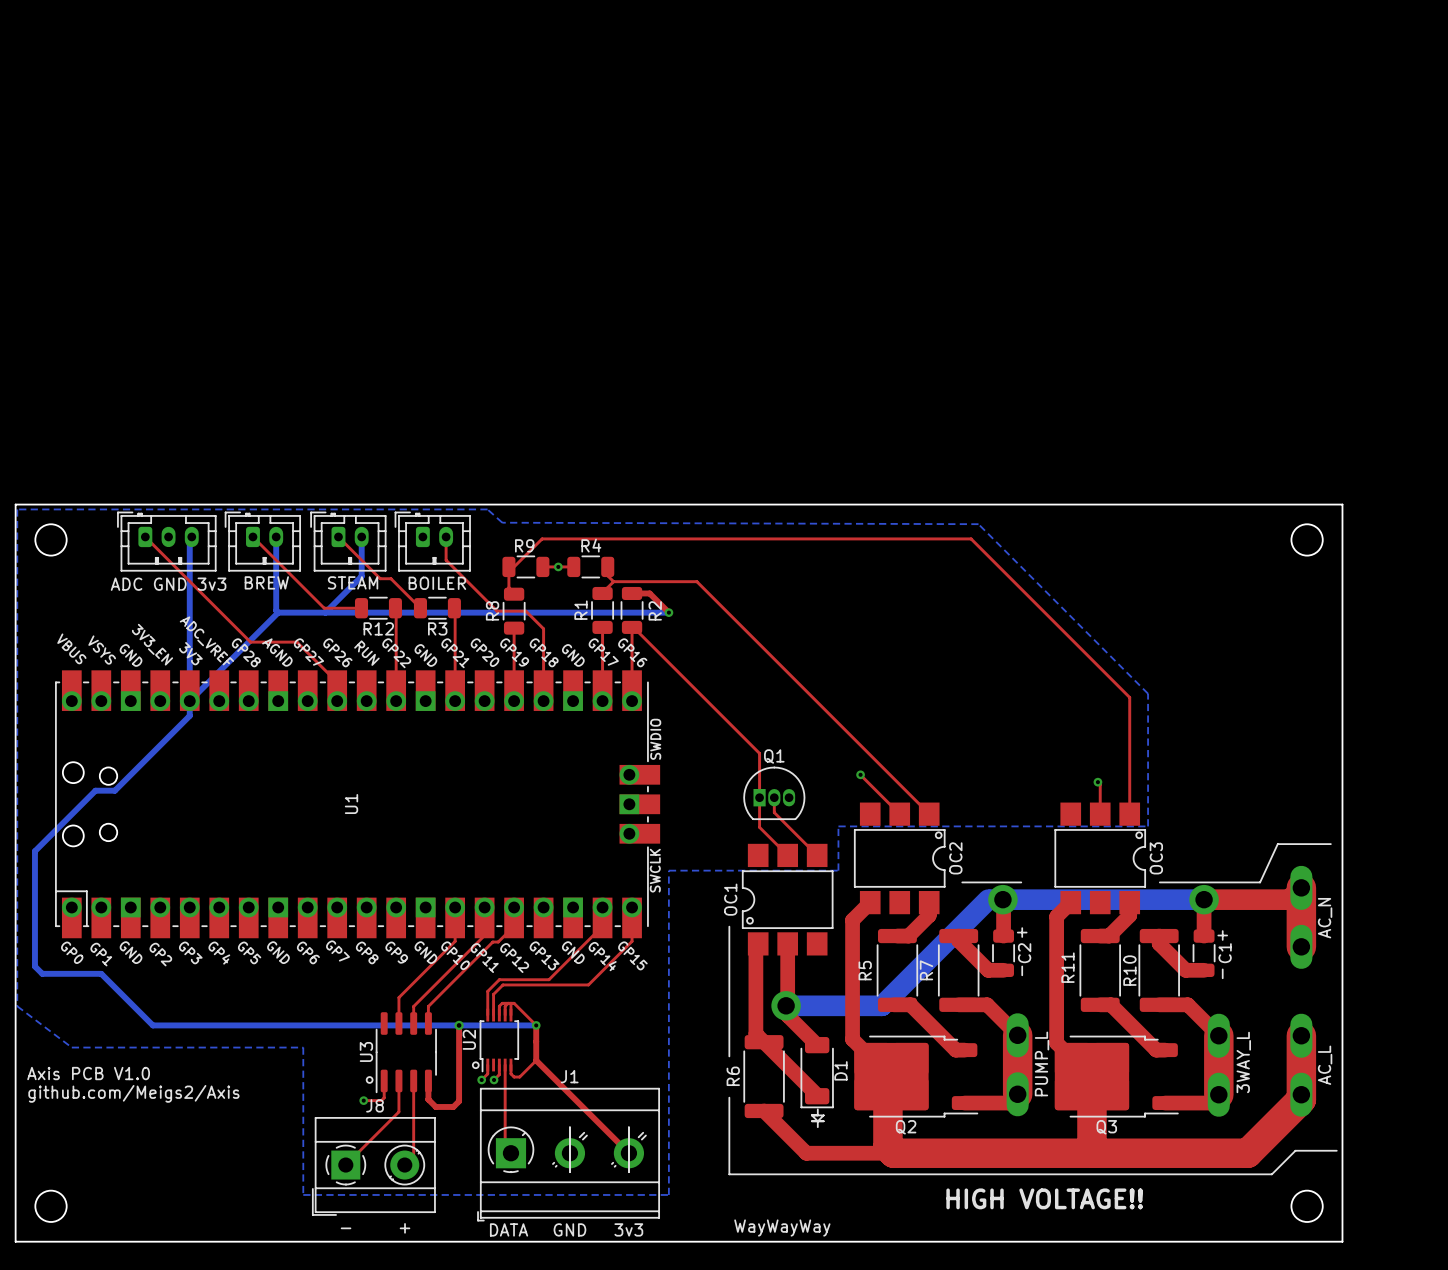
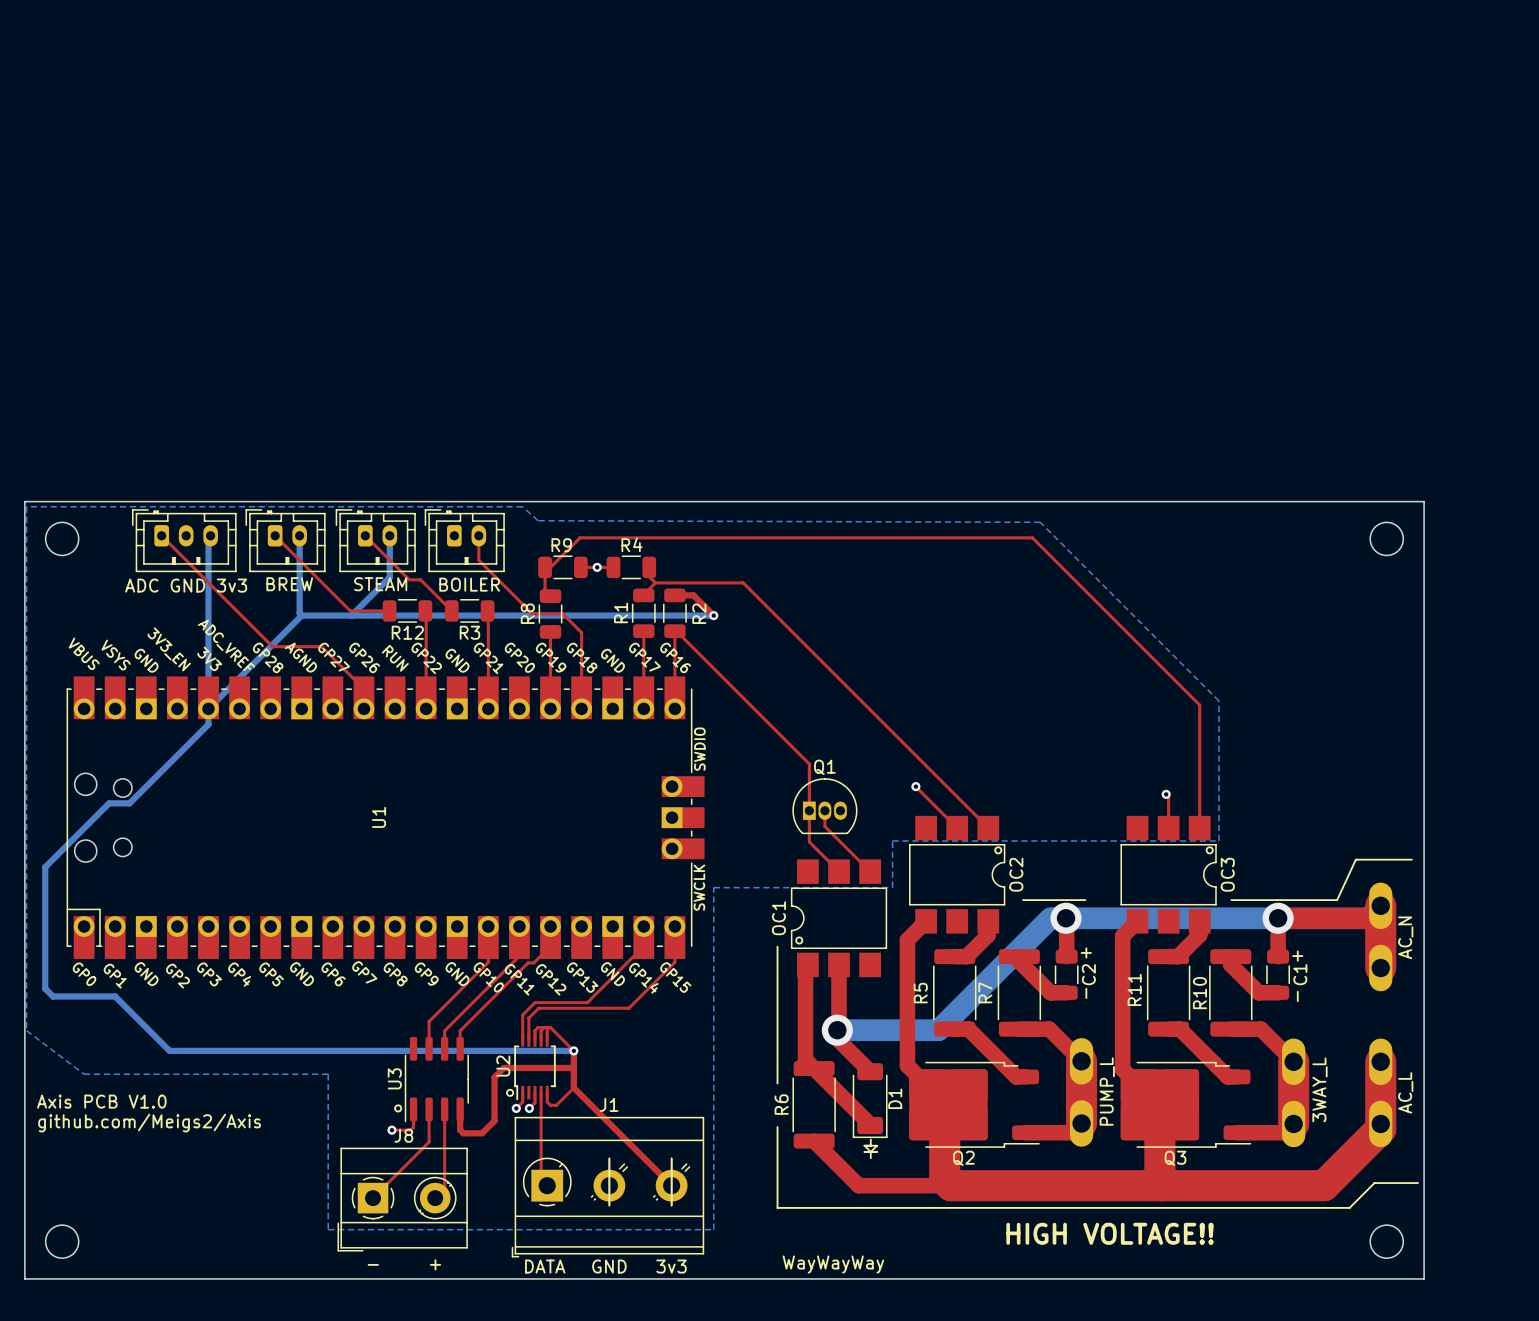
top track: (459, 1025) (459, 1101) (453, 1106) (435, 1106) (428, 1099) -> (573, 1067) (503, 1067) (494, 1077) (494, 1120) (482, 1133) (463, 1133) (460, 1128)
via: (459, 1025) -> none

